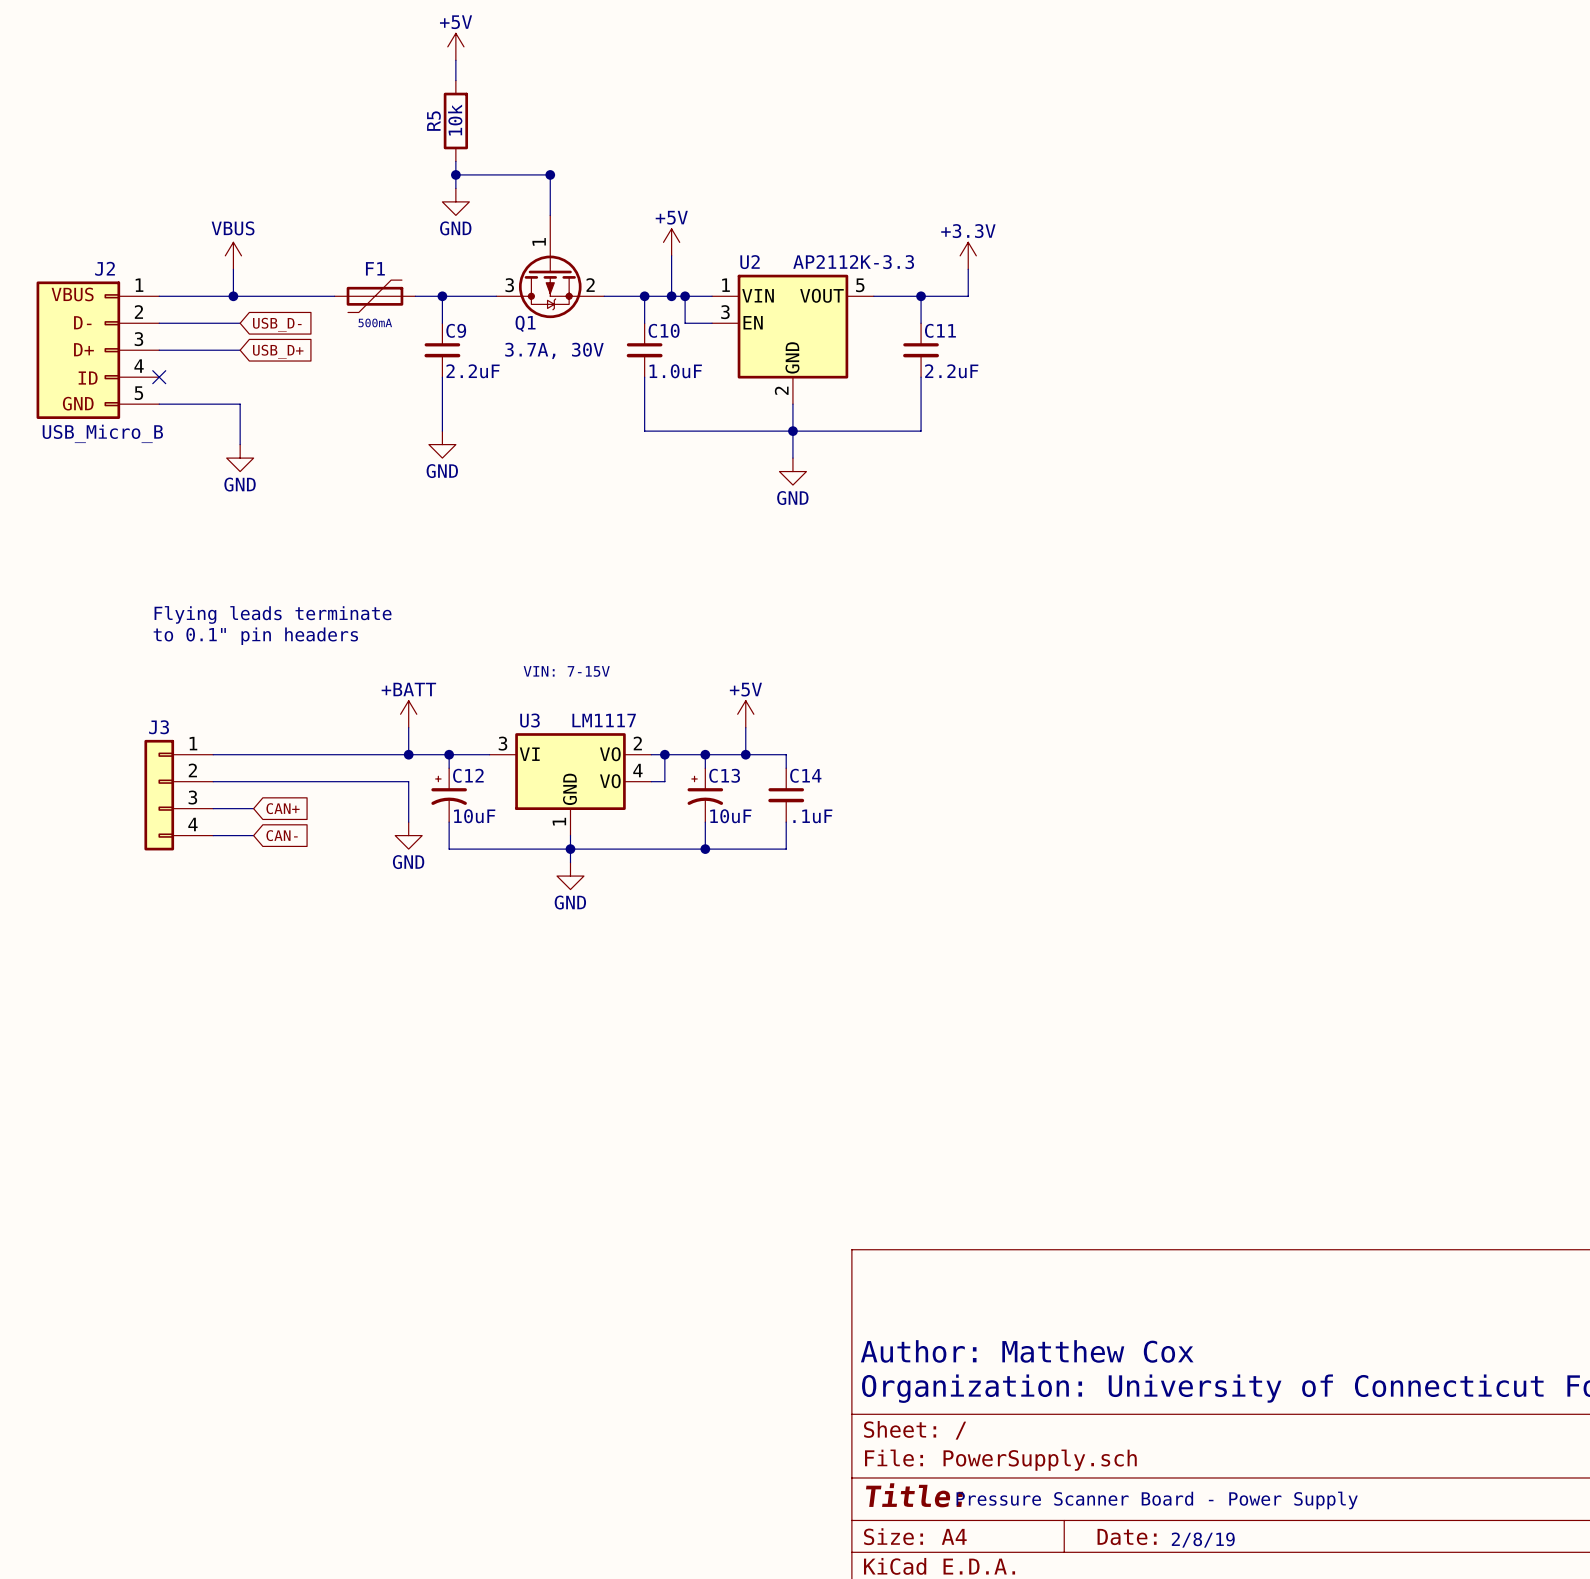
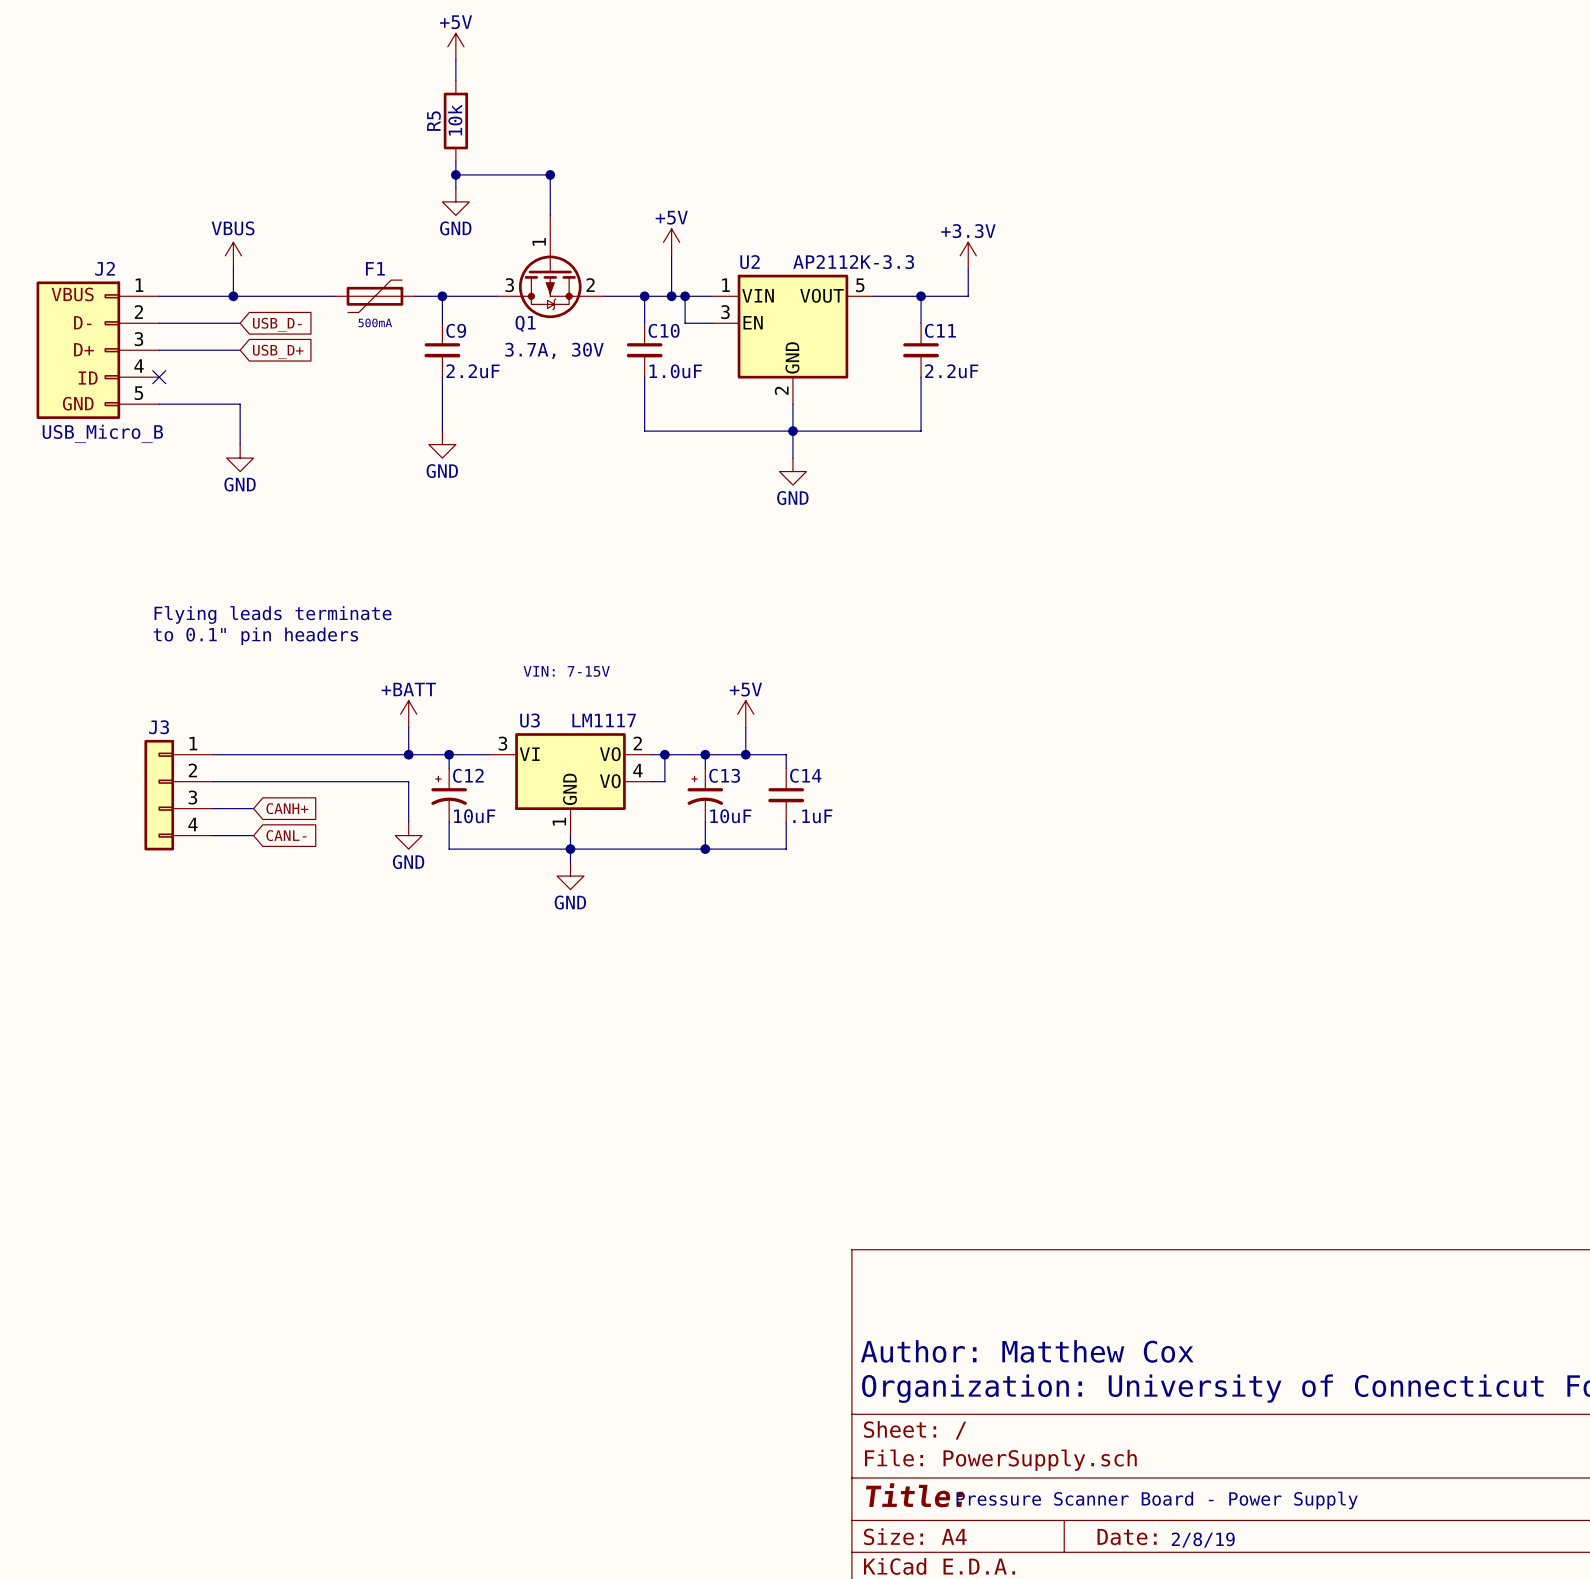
global label: CAN+ (283, 808) -> CANH+ (287, 808)
global label: CAN- (282, 835) -> CANL- (286, 835)

